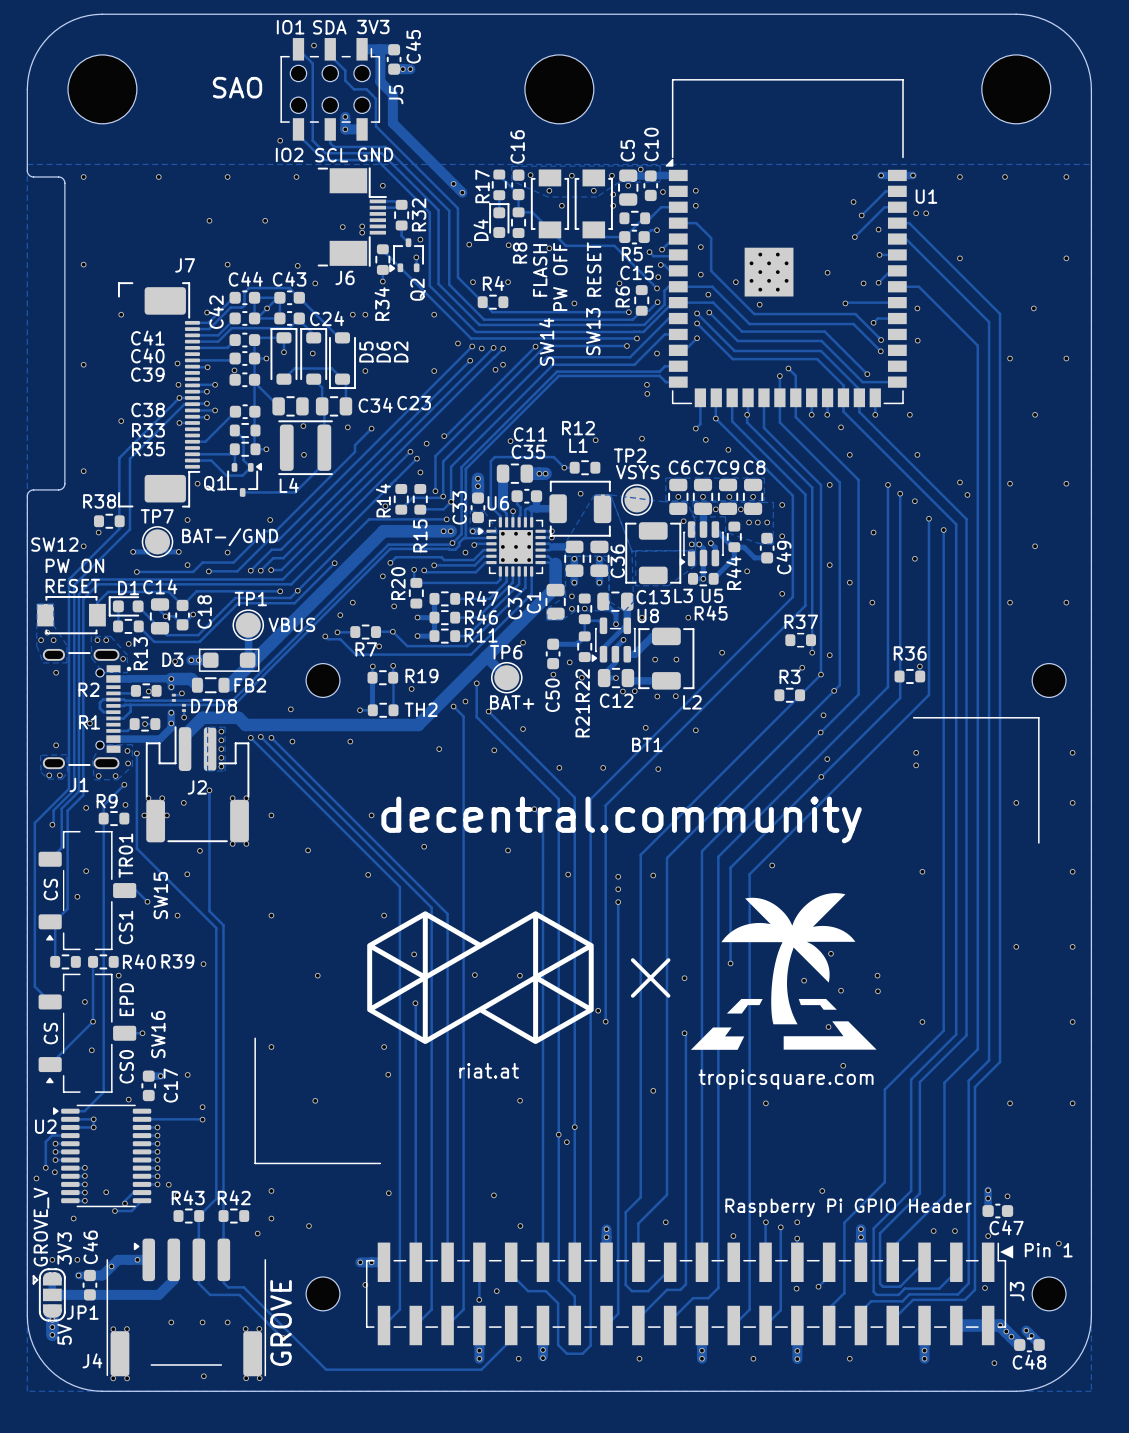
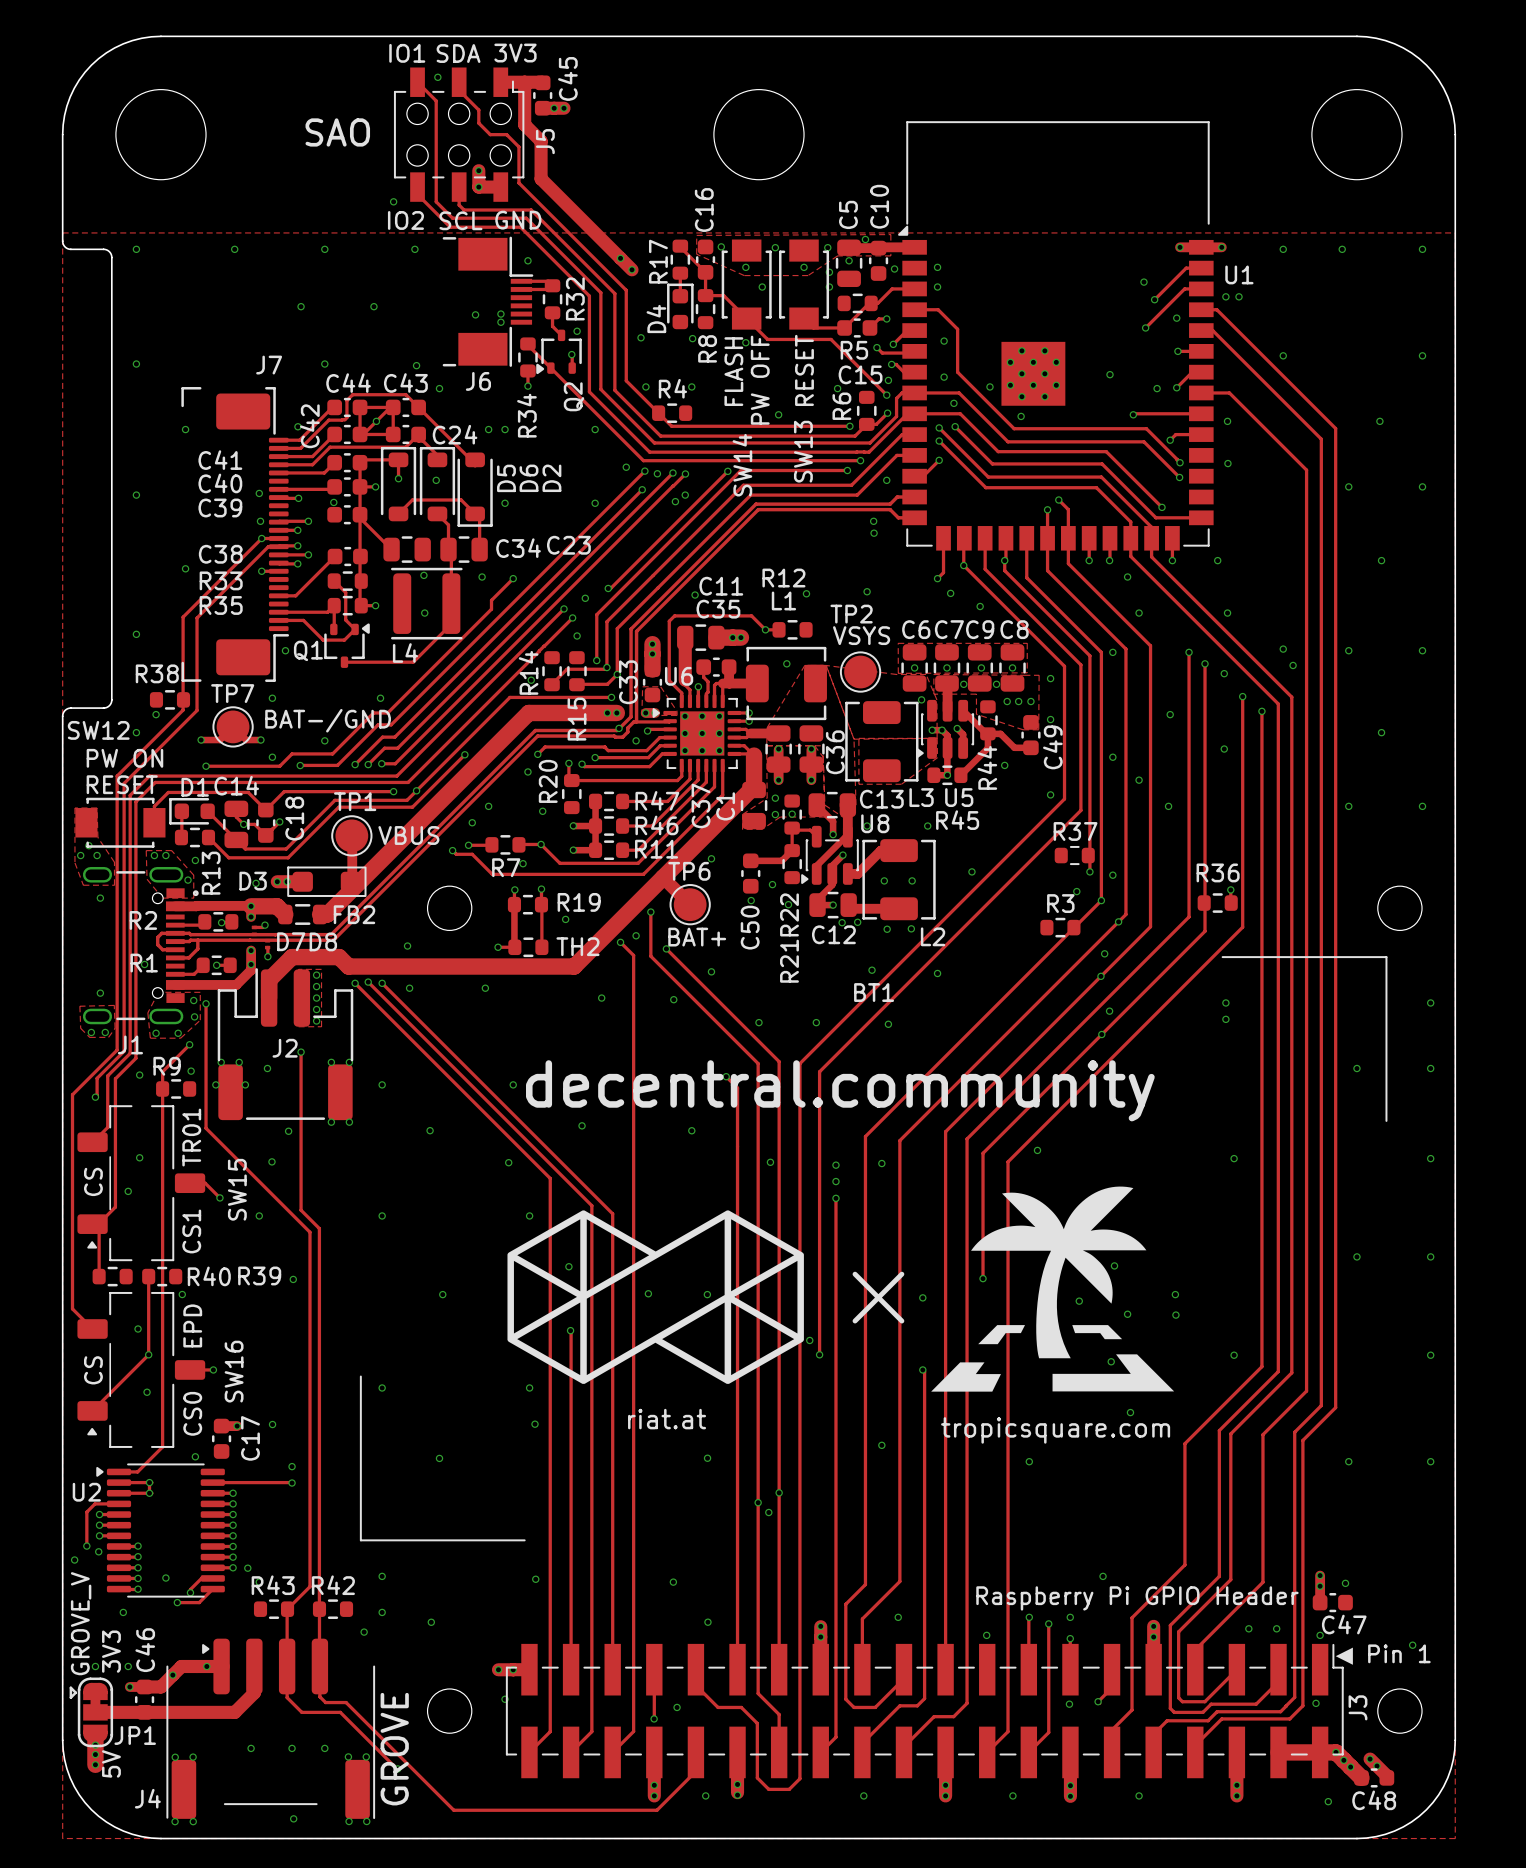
board edge: (64, 483) (60, 489) (32, 490) (28, 492) (27, 533) -> (111, 650) (111, 699) (110, 704) (104, 708) (68, 708) (64, 711) (62, 716)

